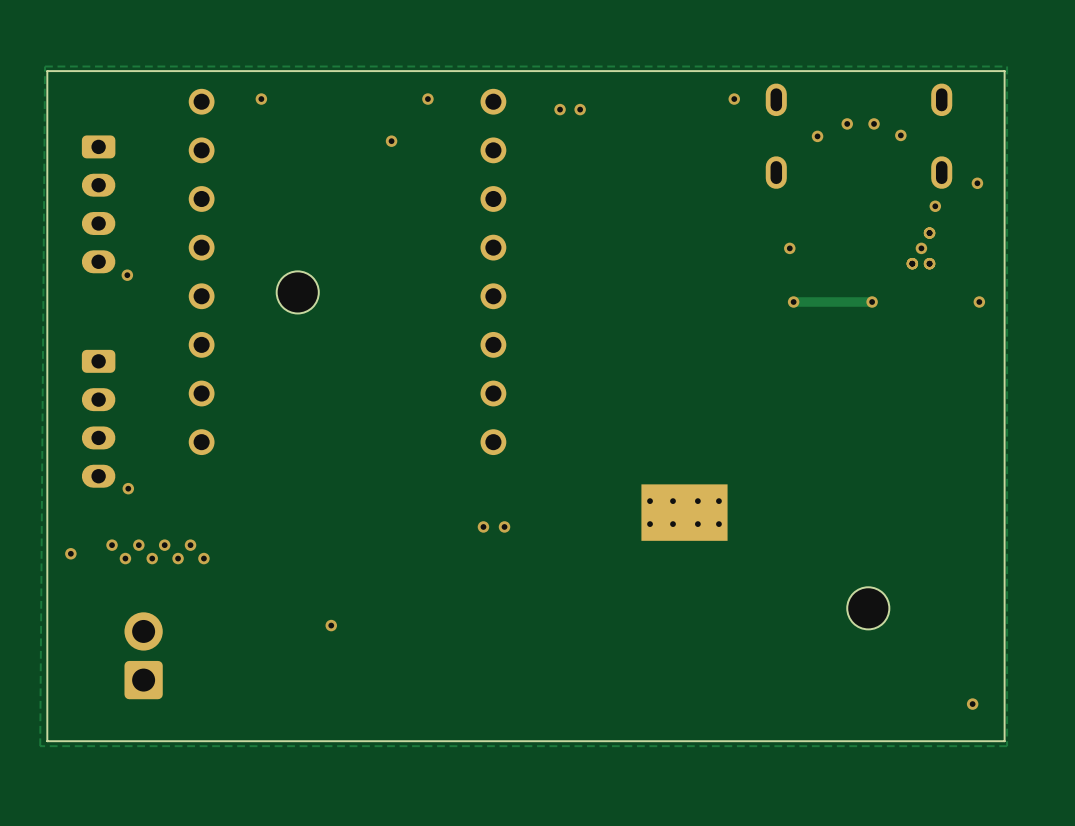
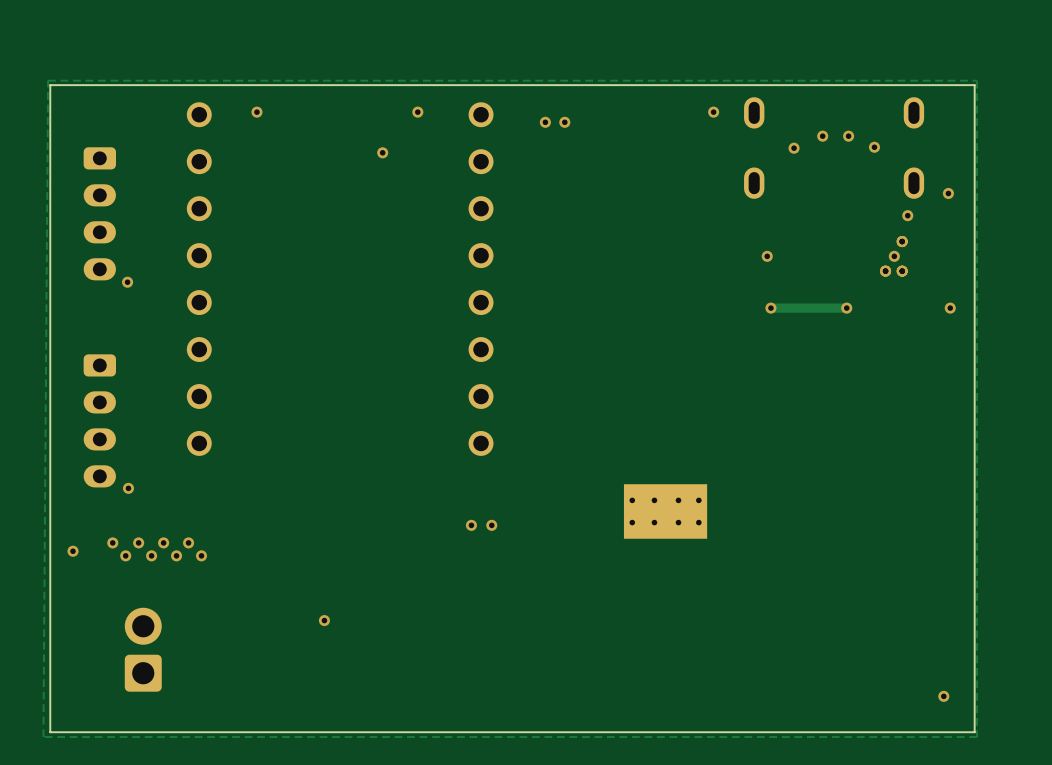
part: (297, 292) -> none
part: (868, 608) -> none

